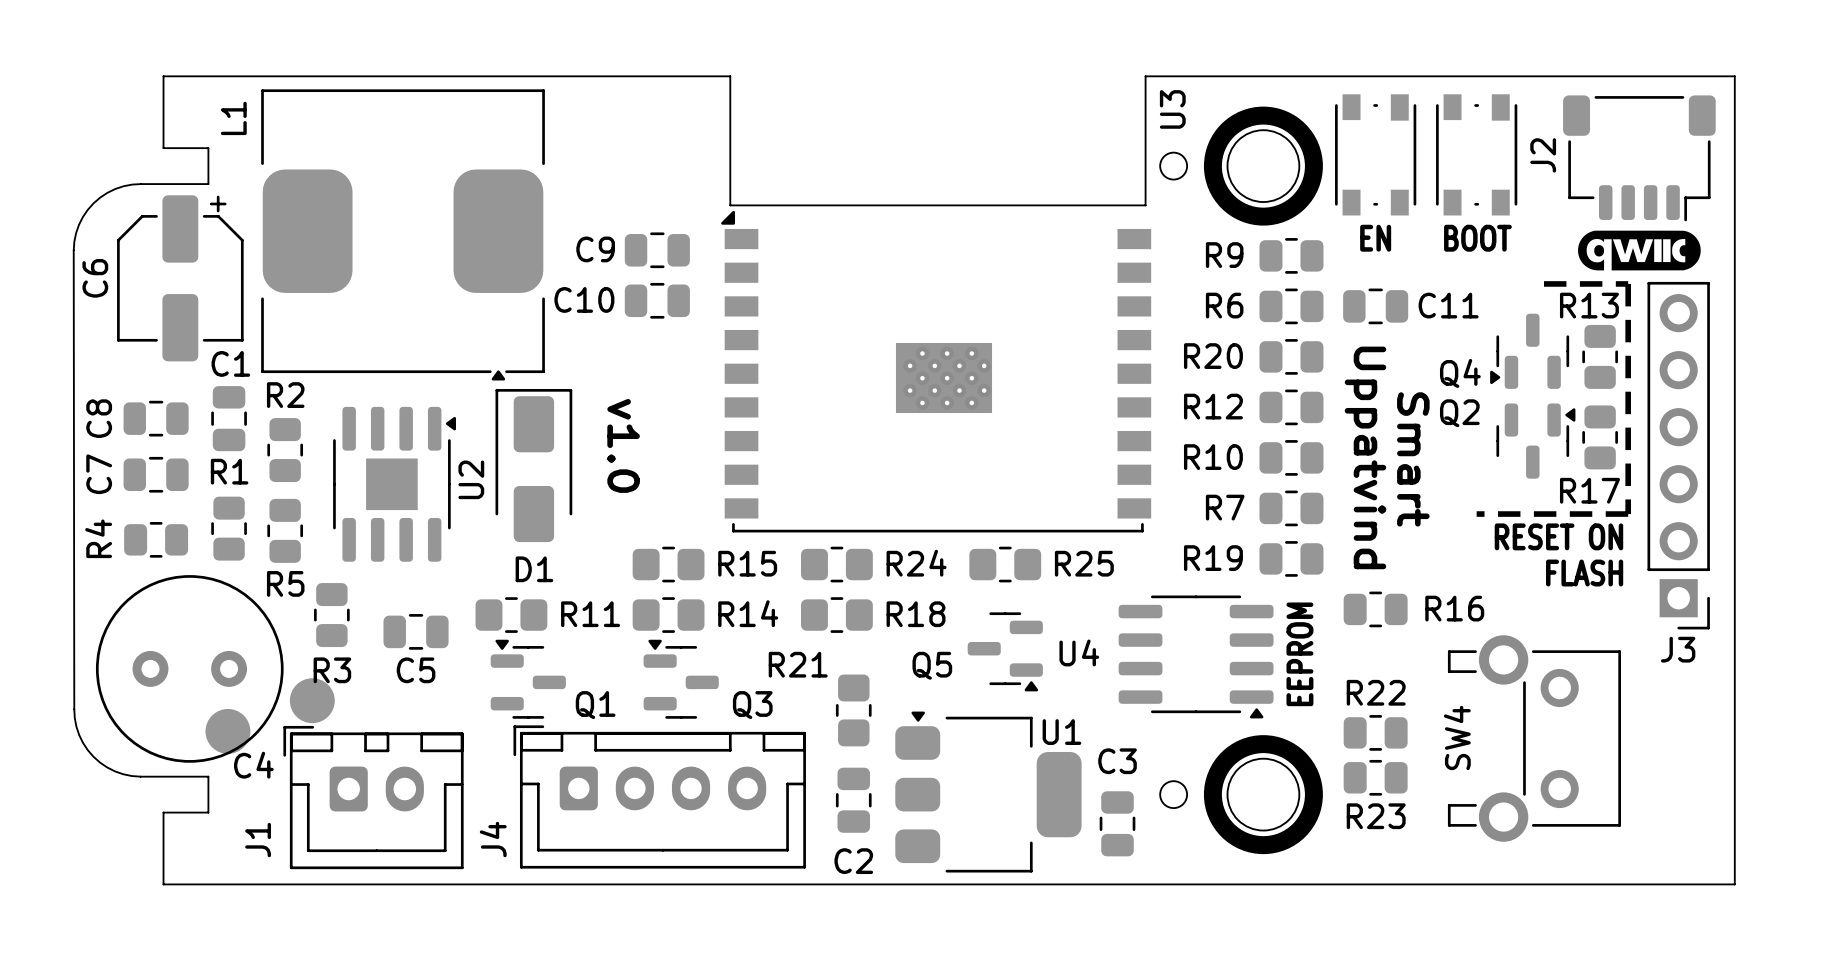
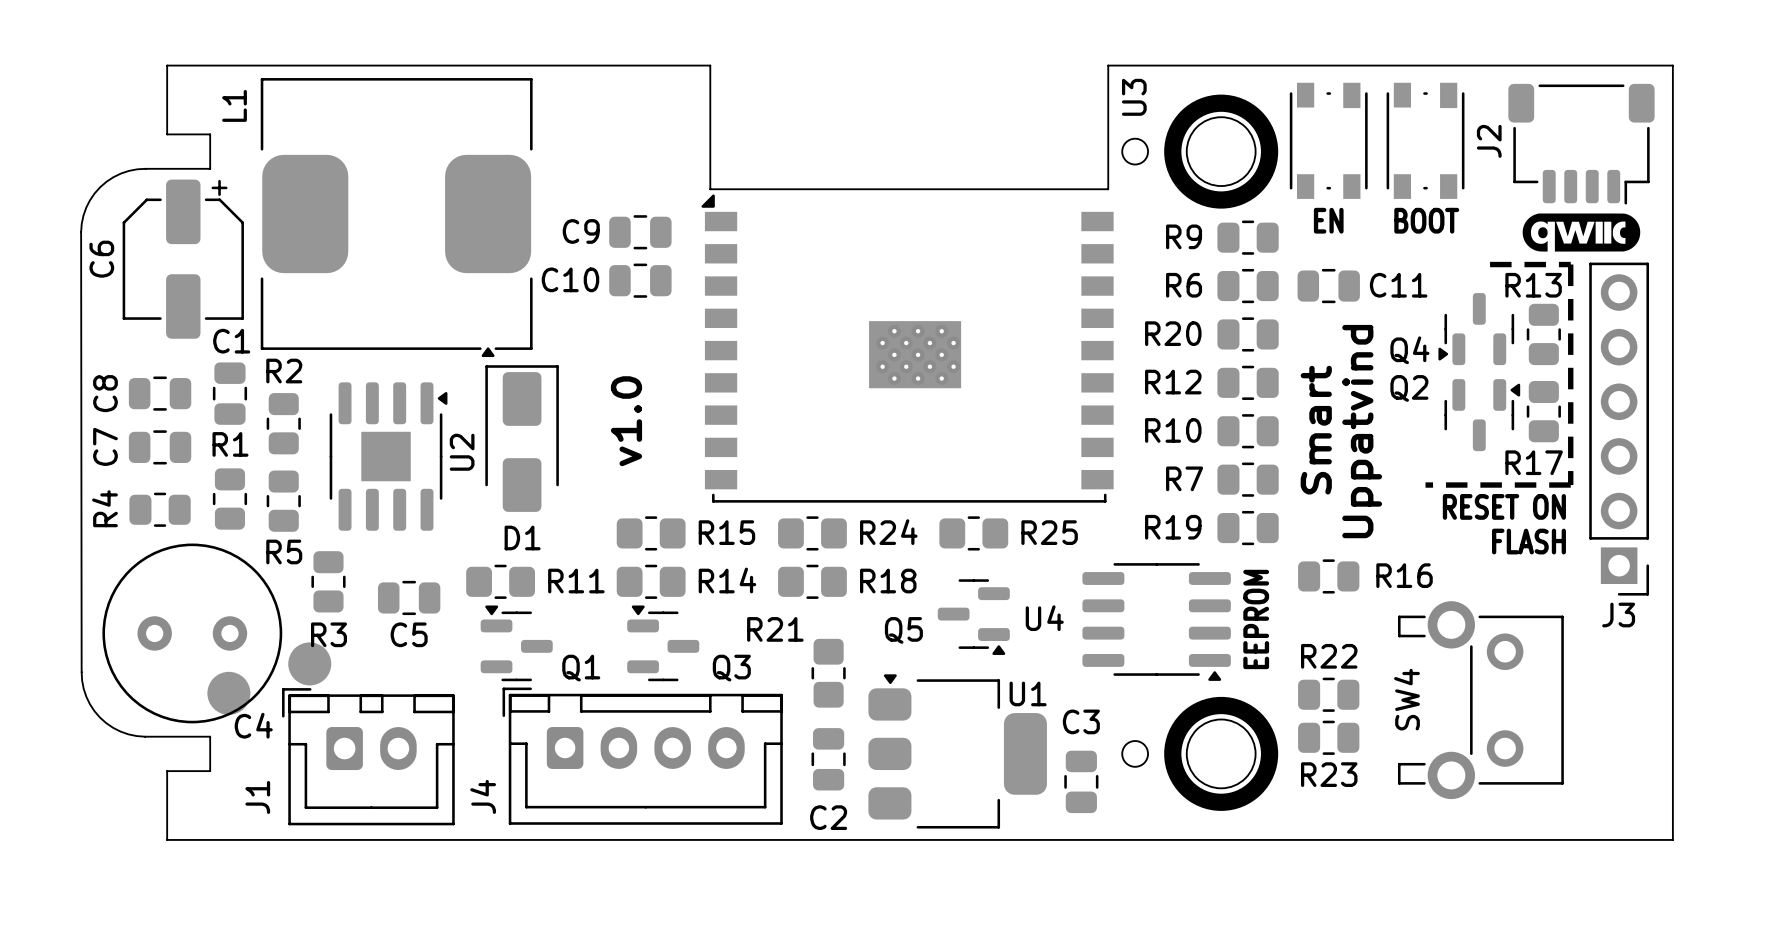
text rotation: 0° (623, 445) -> 180° (626, 421)
text rotation: 0° (1365, 457) -> 180° (1362, 431)
text rotation: 0° (1413, 459) -> 180° (1316, 430)

